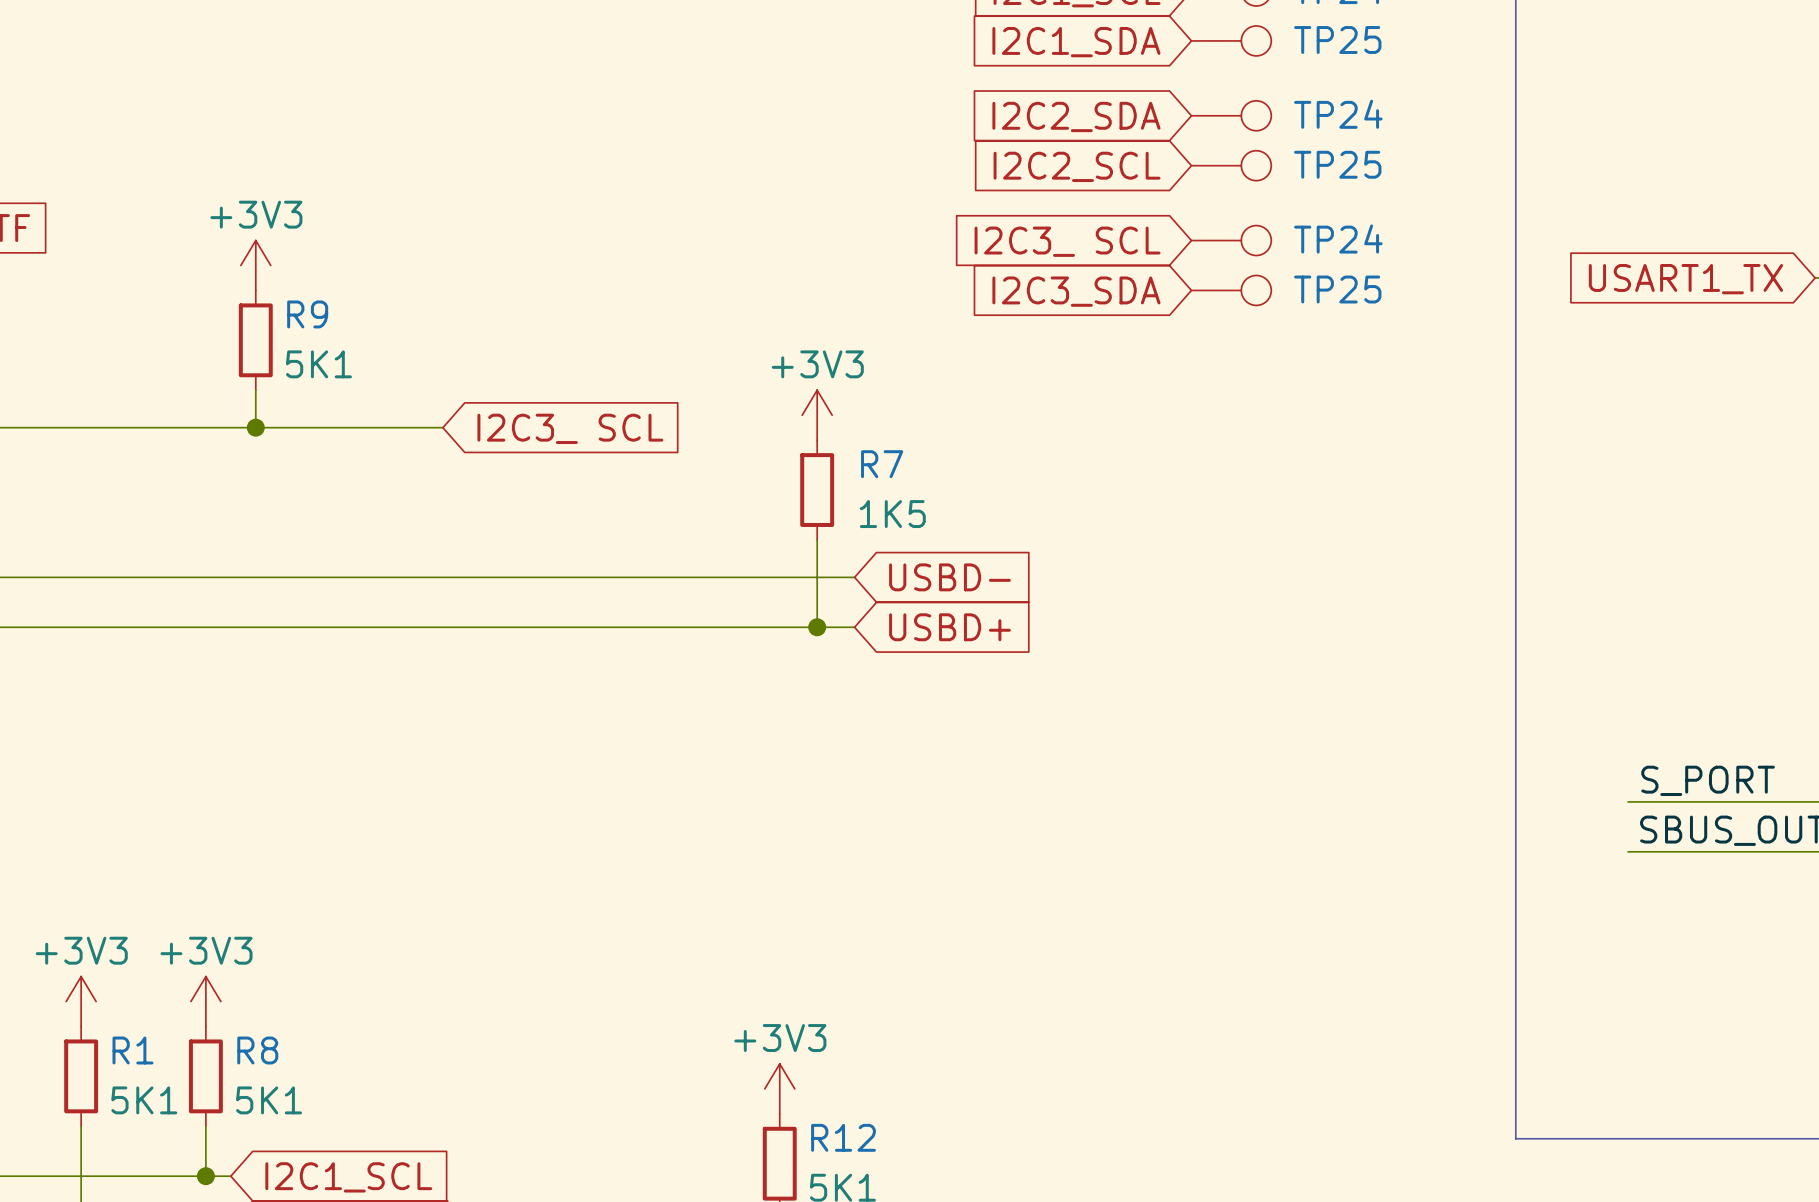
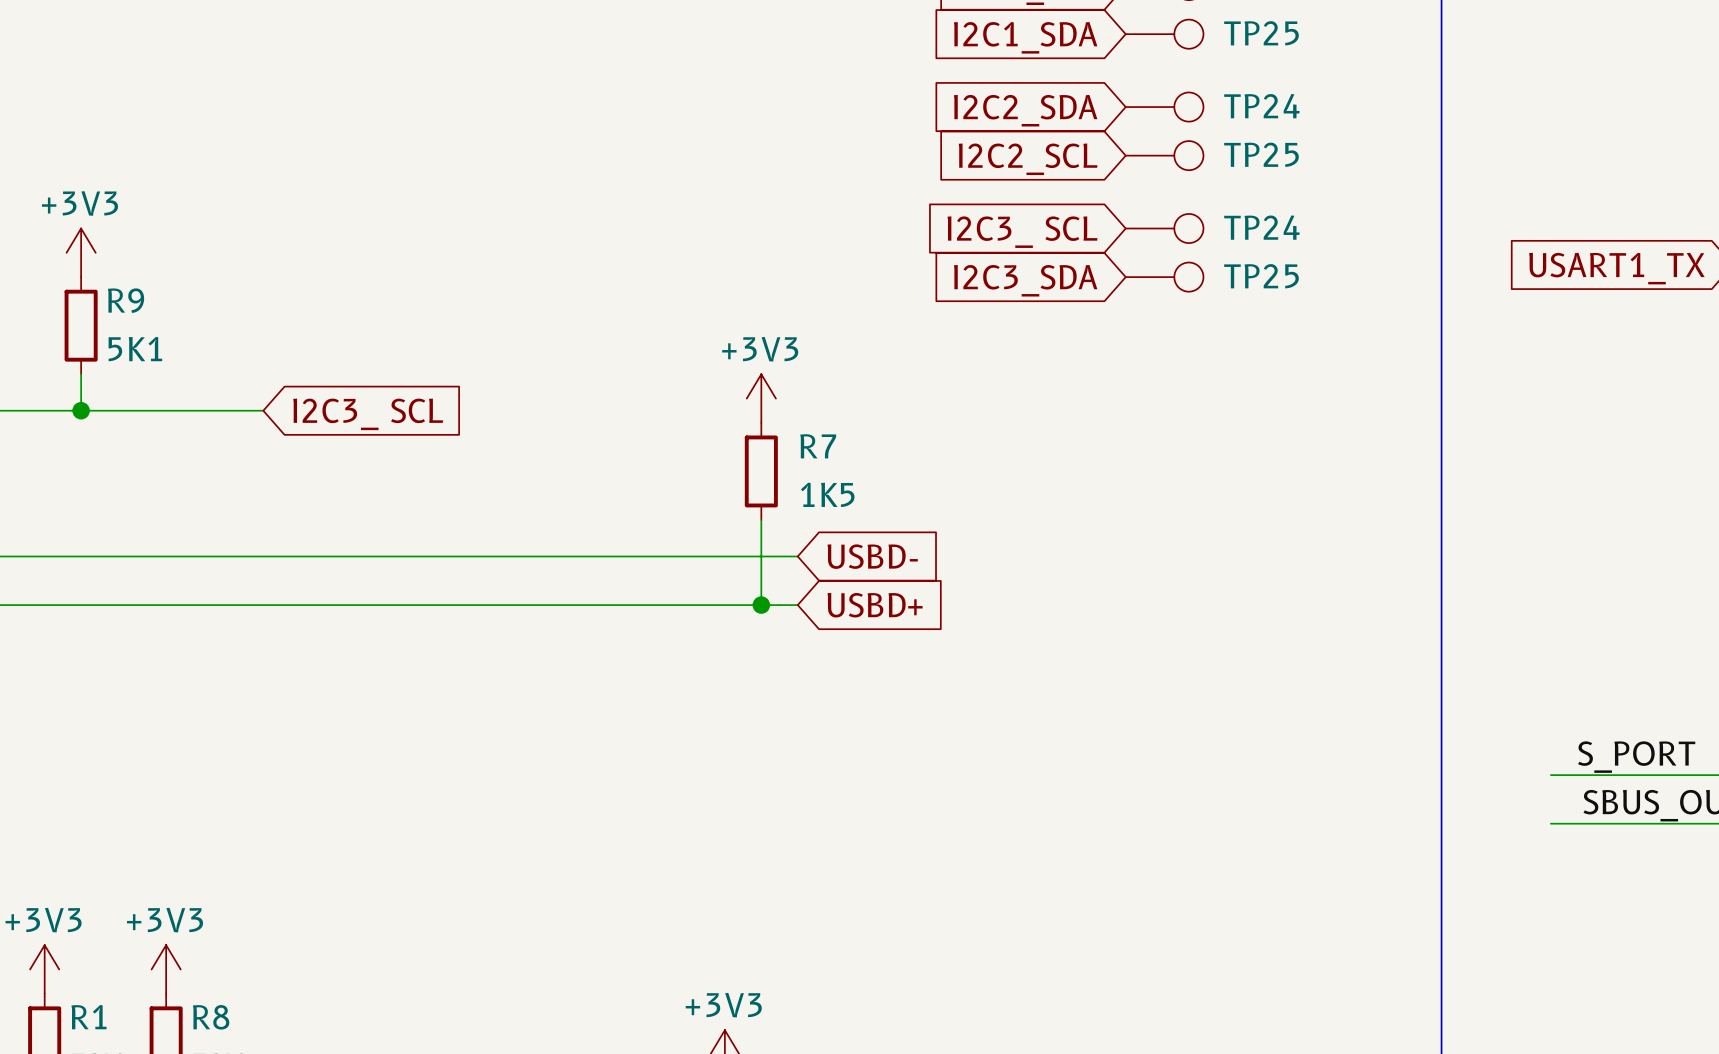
power symbol position: +3V3 (255, 265) -> +3V3 (81, 252)
R9 position: (255, 340) -> (81, 325)
wire: (255, 390) (255, 427) -> (81, 374) (81, 410)
junction: none -> (81, 410)
junction: (255, 427) -> none
wire: (305, 427) (442, 427) -> none
global label position: I2C3_ SCL (570, 428) -> I2C3_ SCL (368, 414)

